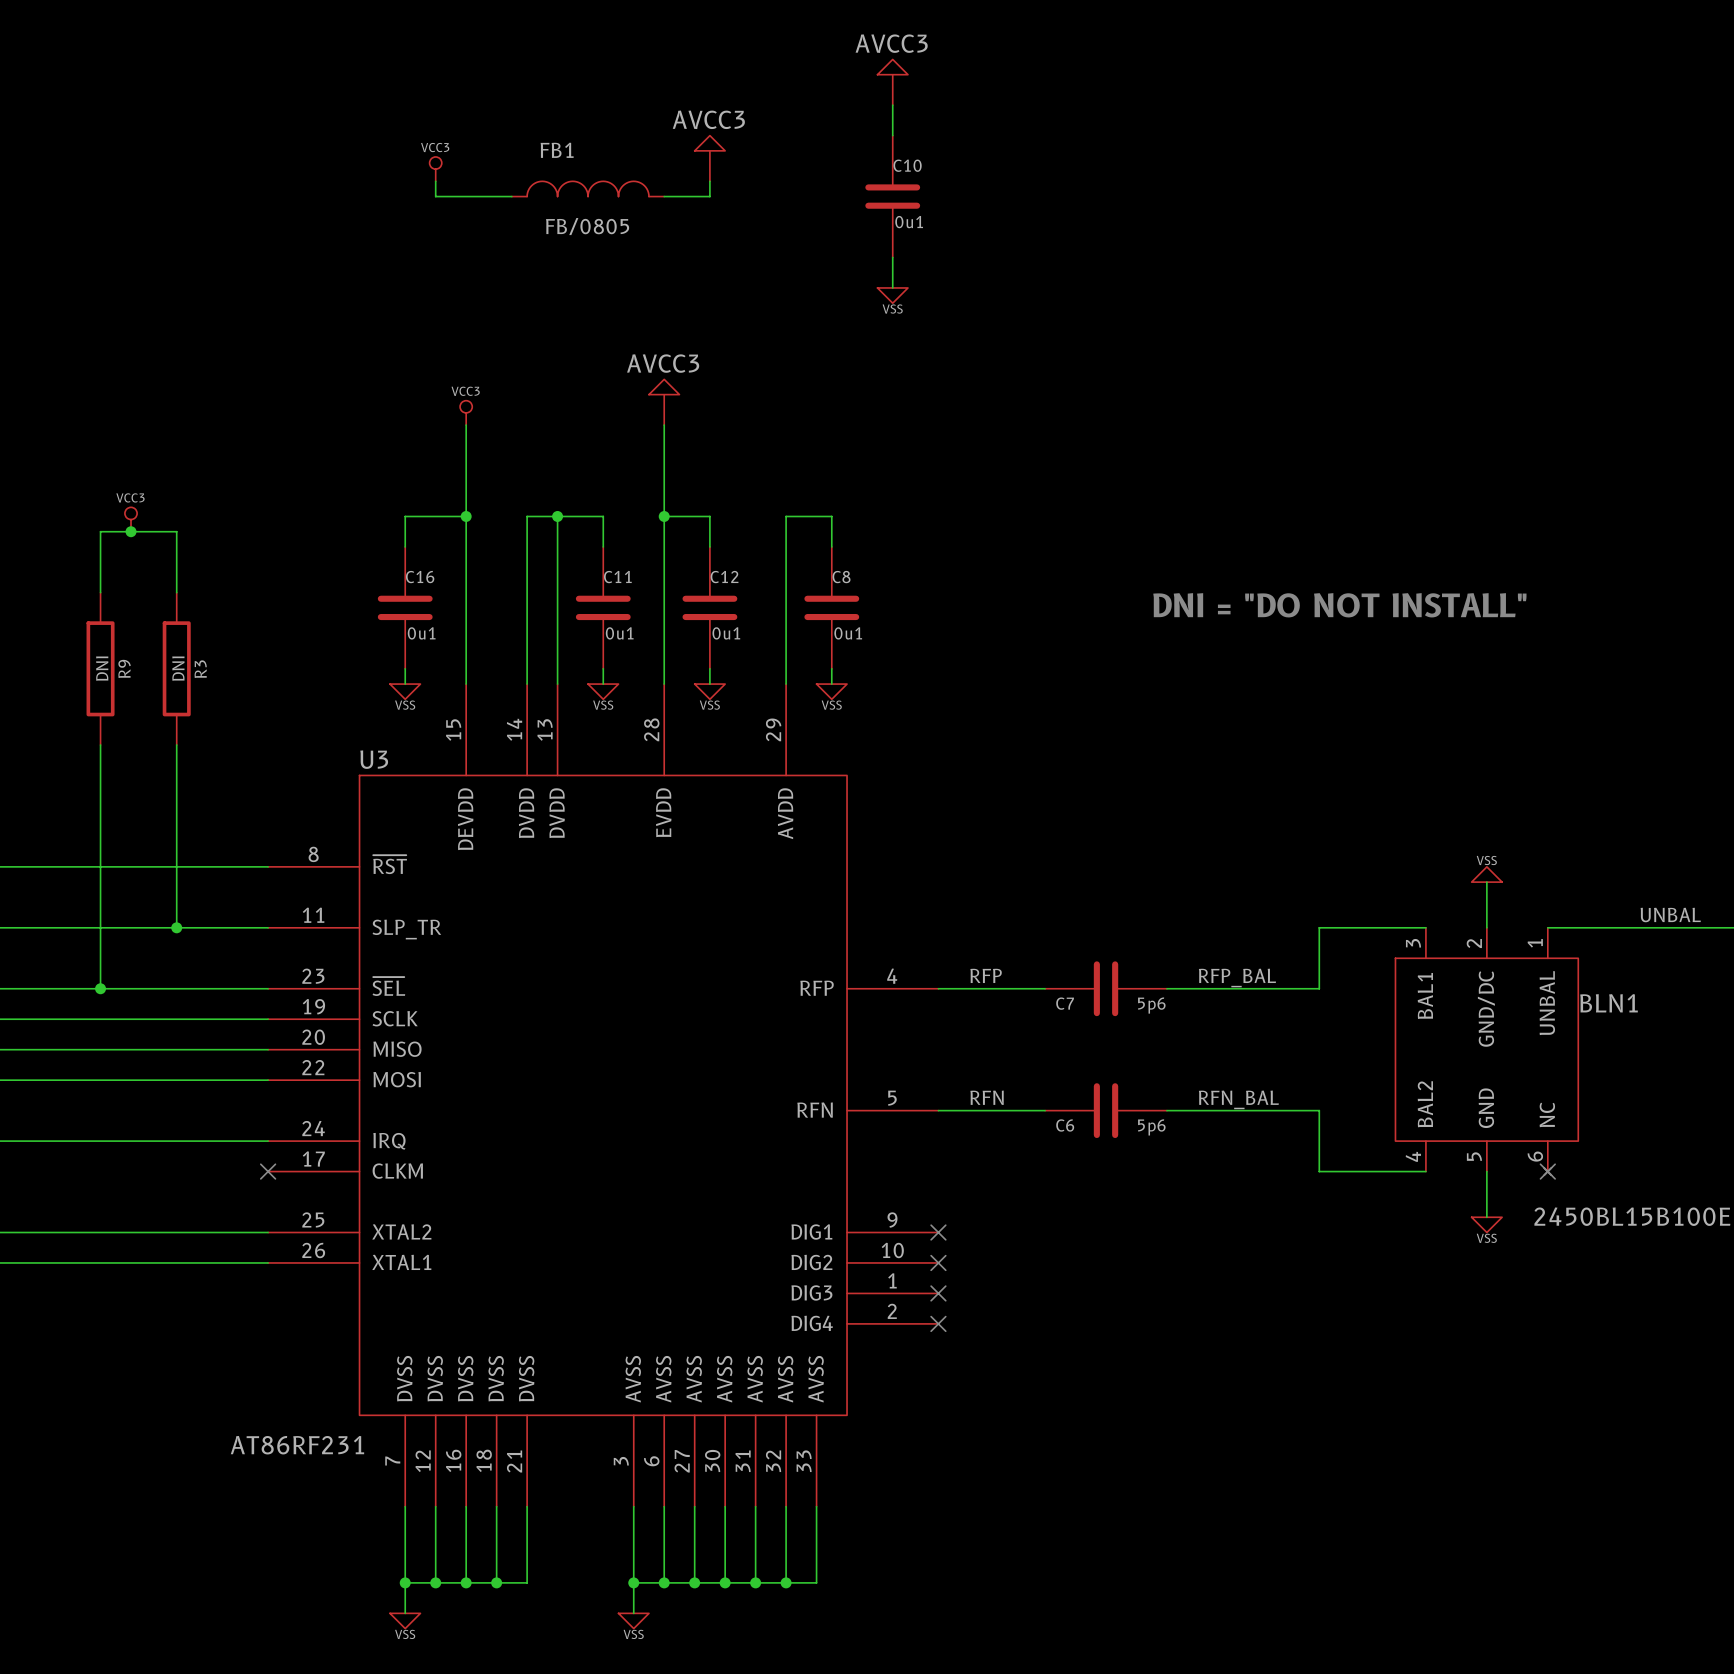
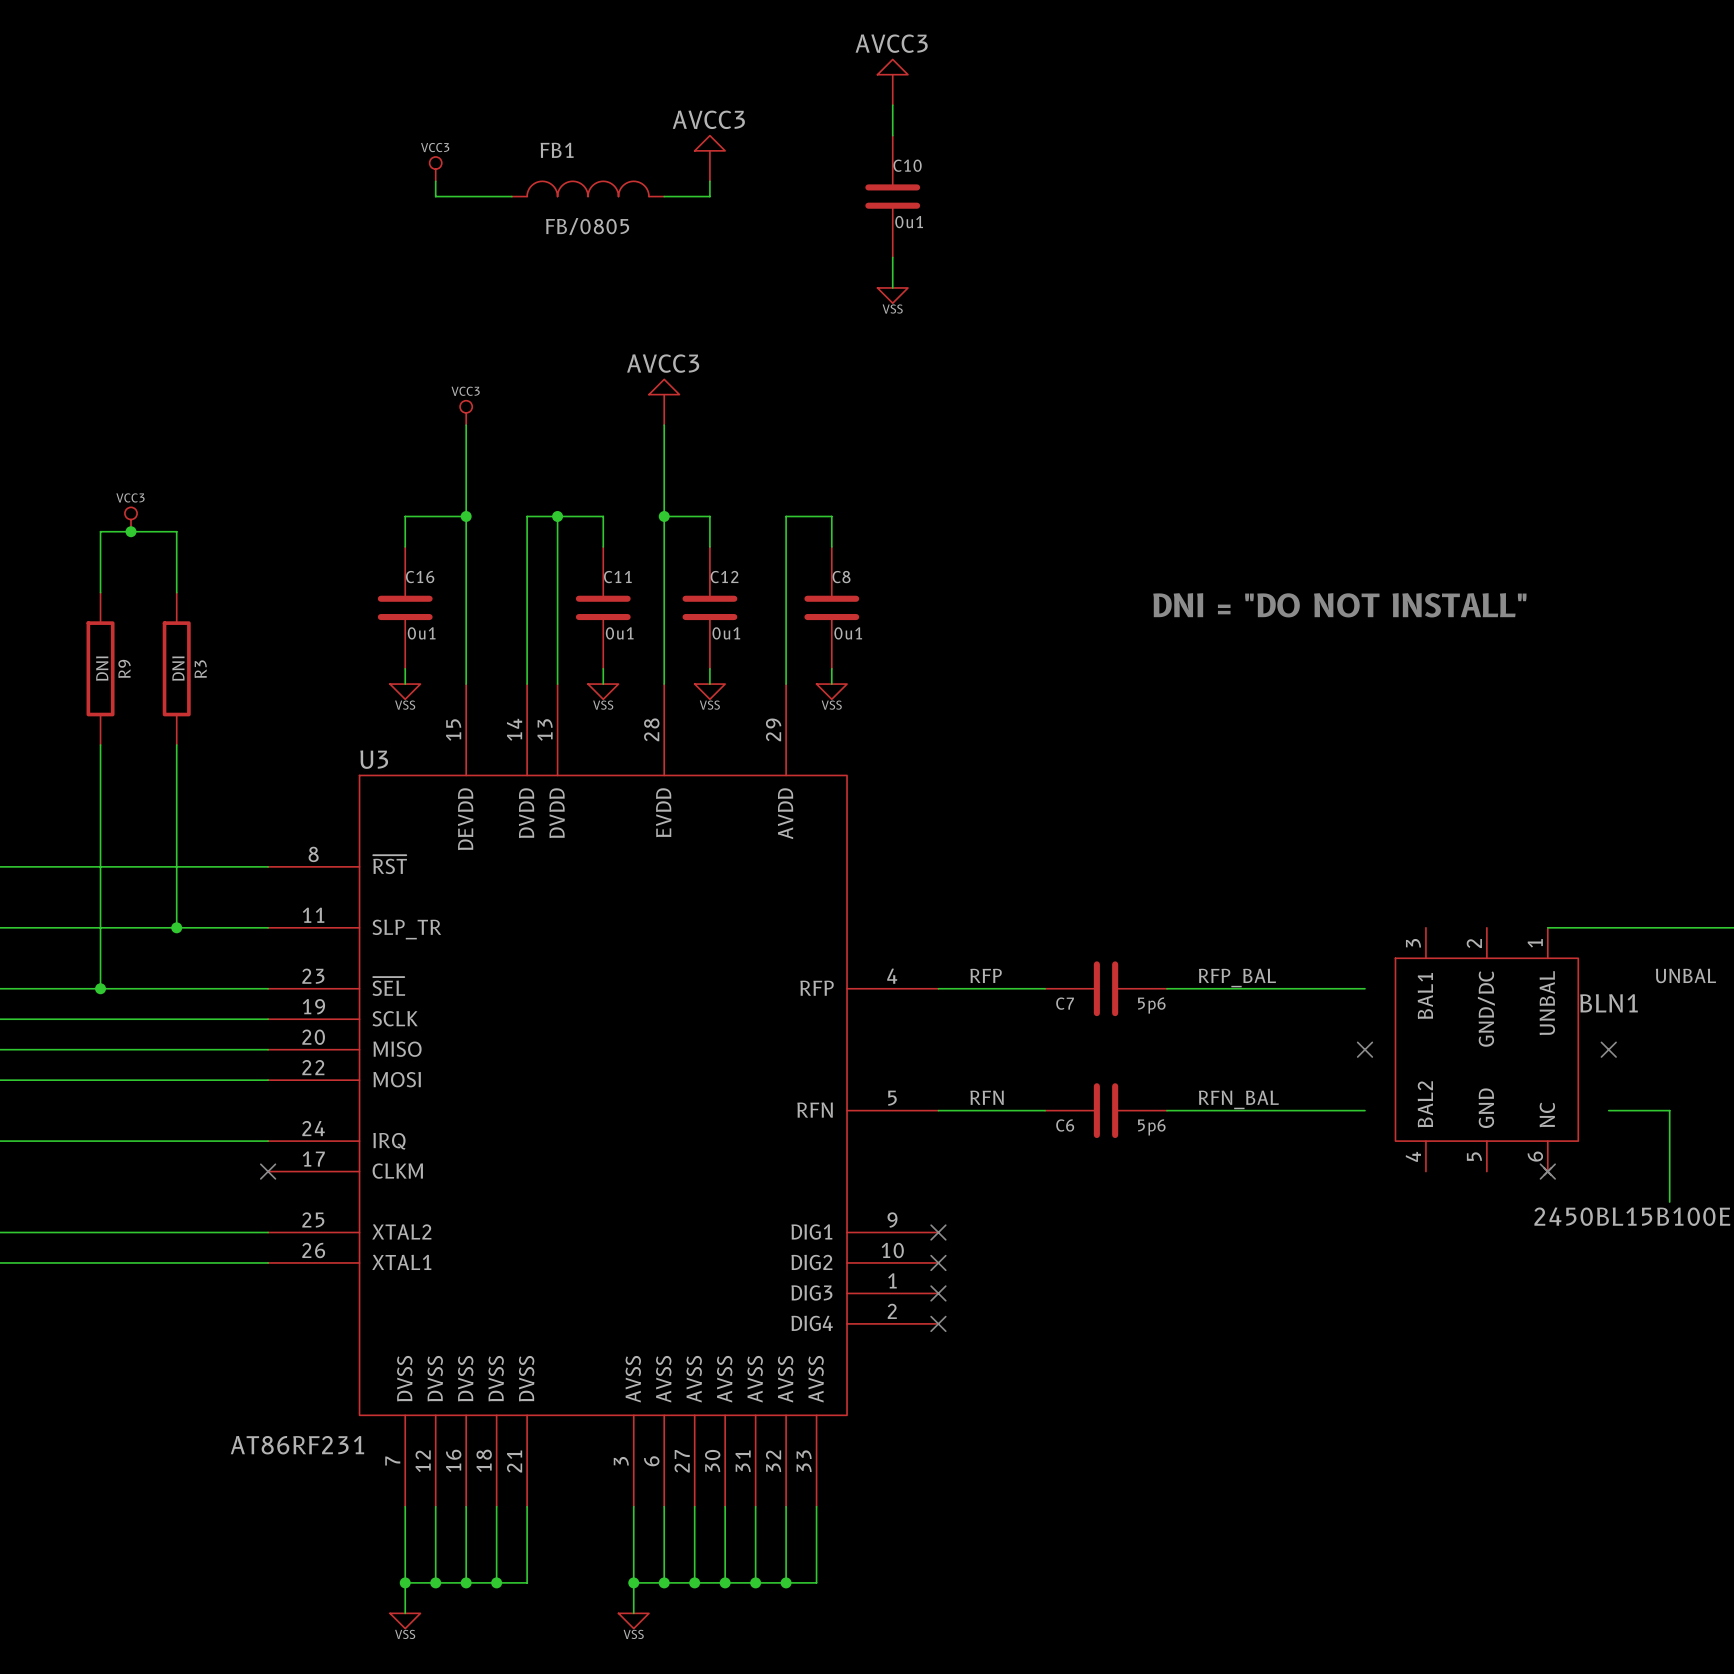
power symbol: VSS (1486, 874) -> none
wire: (1486, 882) (1486, 927) -> none
label position: UNBAL (1670, 915) -> UNBAL (1685, 975)
wire: (1425, 927) (1319, 927) (1319, 988) -> (1365, 988) (1319, 988)
no-connect mark: none -> (1365, 1049)
no-connect mark: none -> (1608, 1049)
wire: (1319, 1110) (1319, 1171) (1425, 1171) -> (1319, 1110) (1365, 1110)
wire: none -> (1608, 1110) (1669, 1110) (1669, 1202)
wire: (1486, 1171) (1486, 1217) -> none
power symbol: VSS (1486, 1224) -> none

